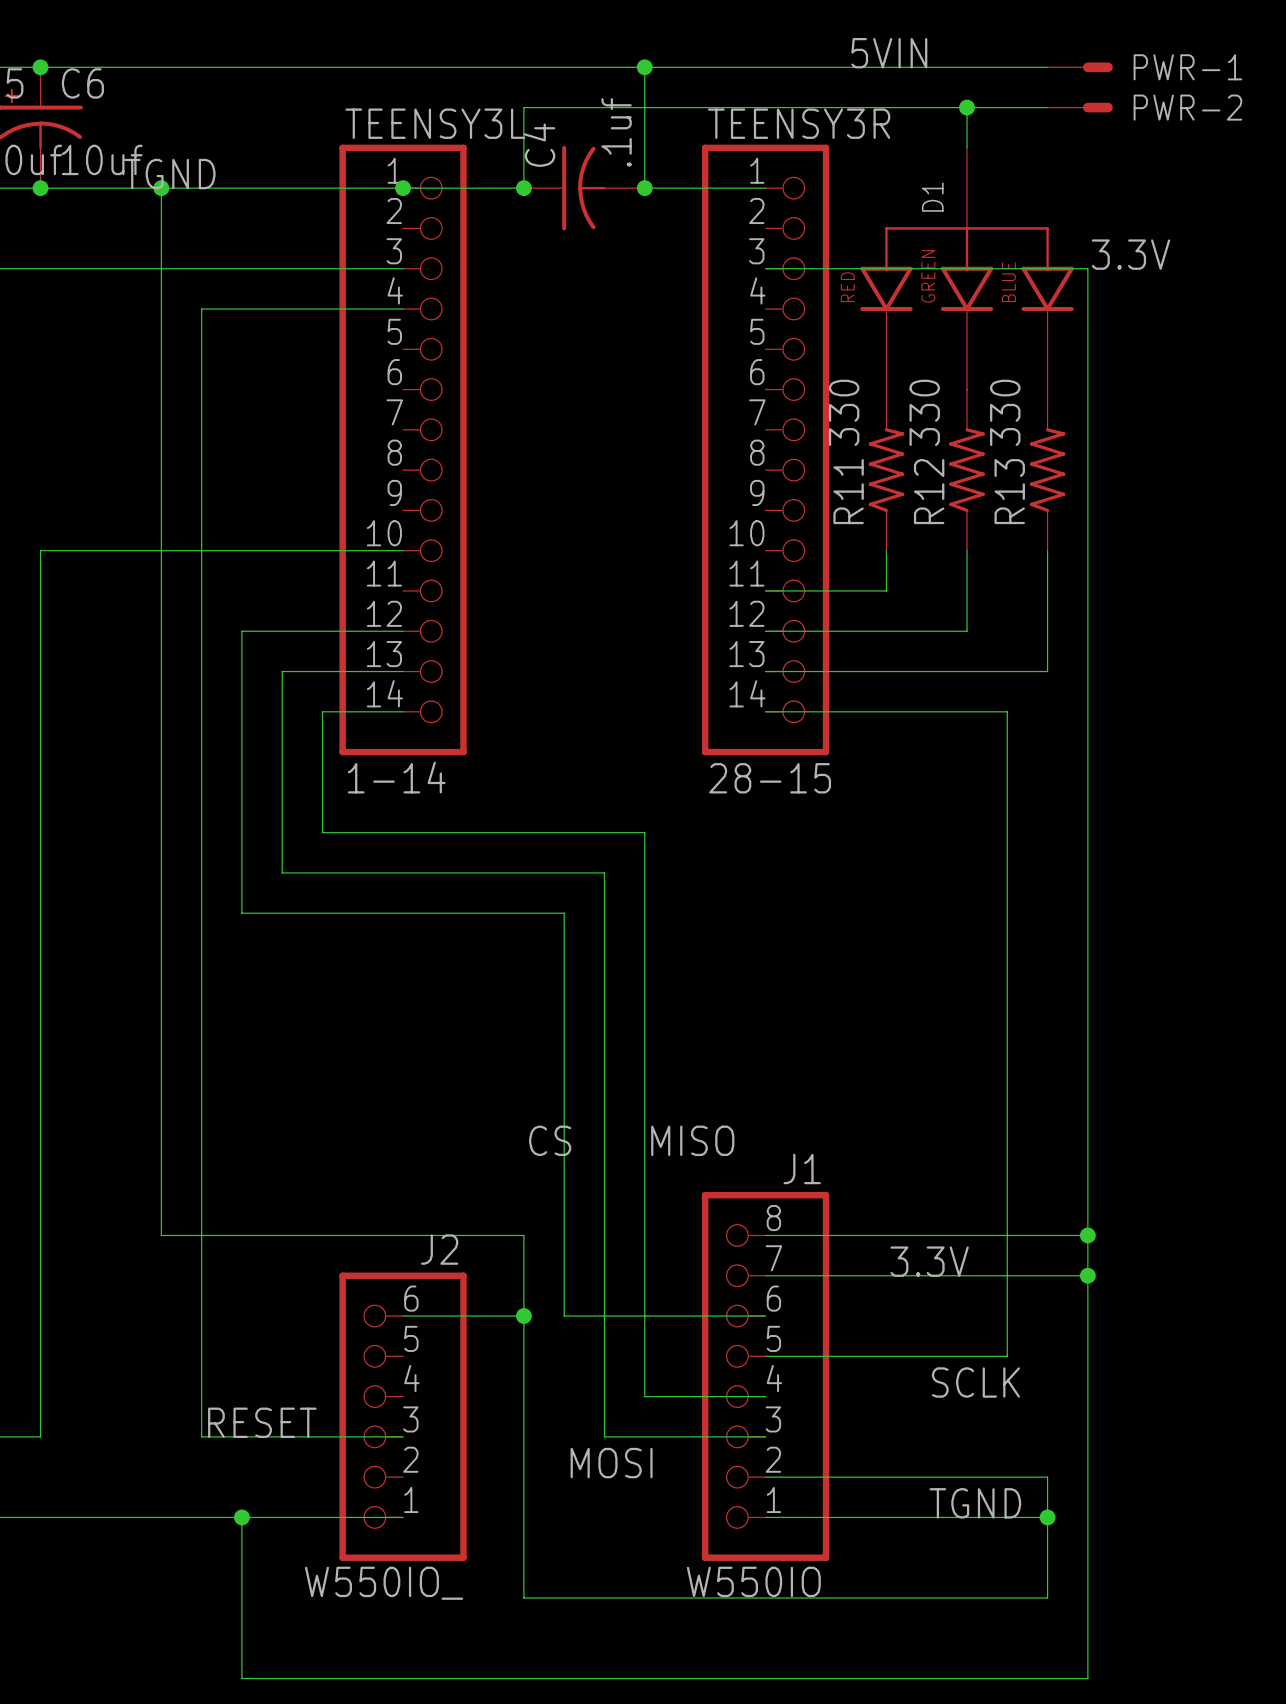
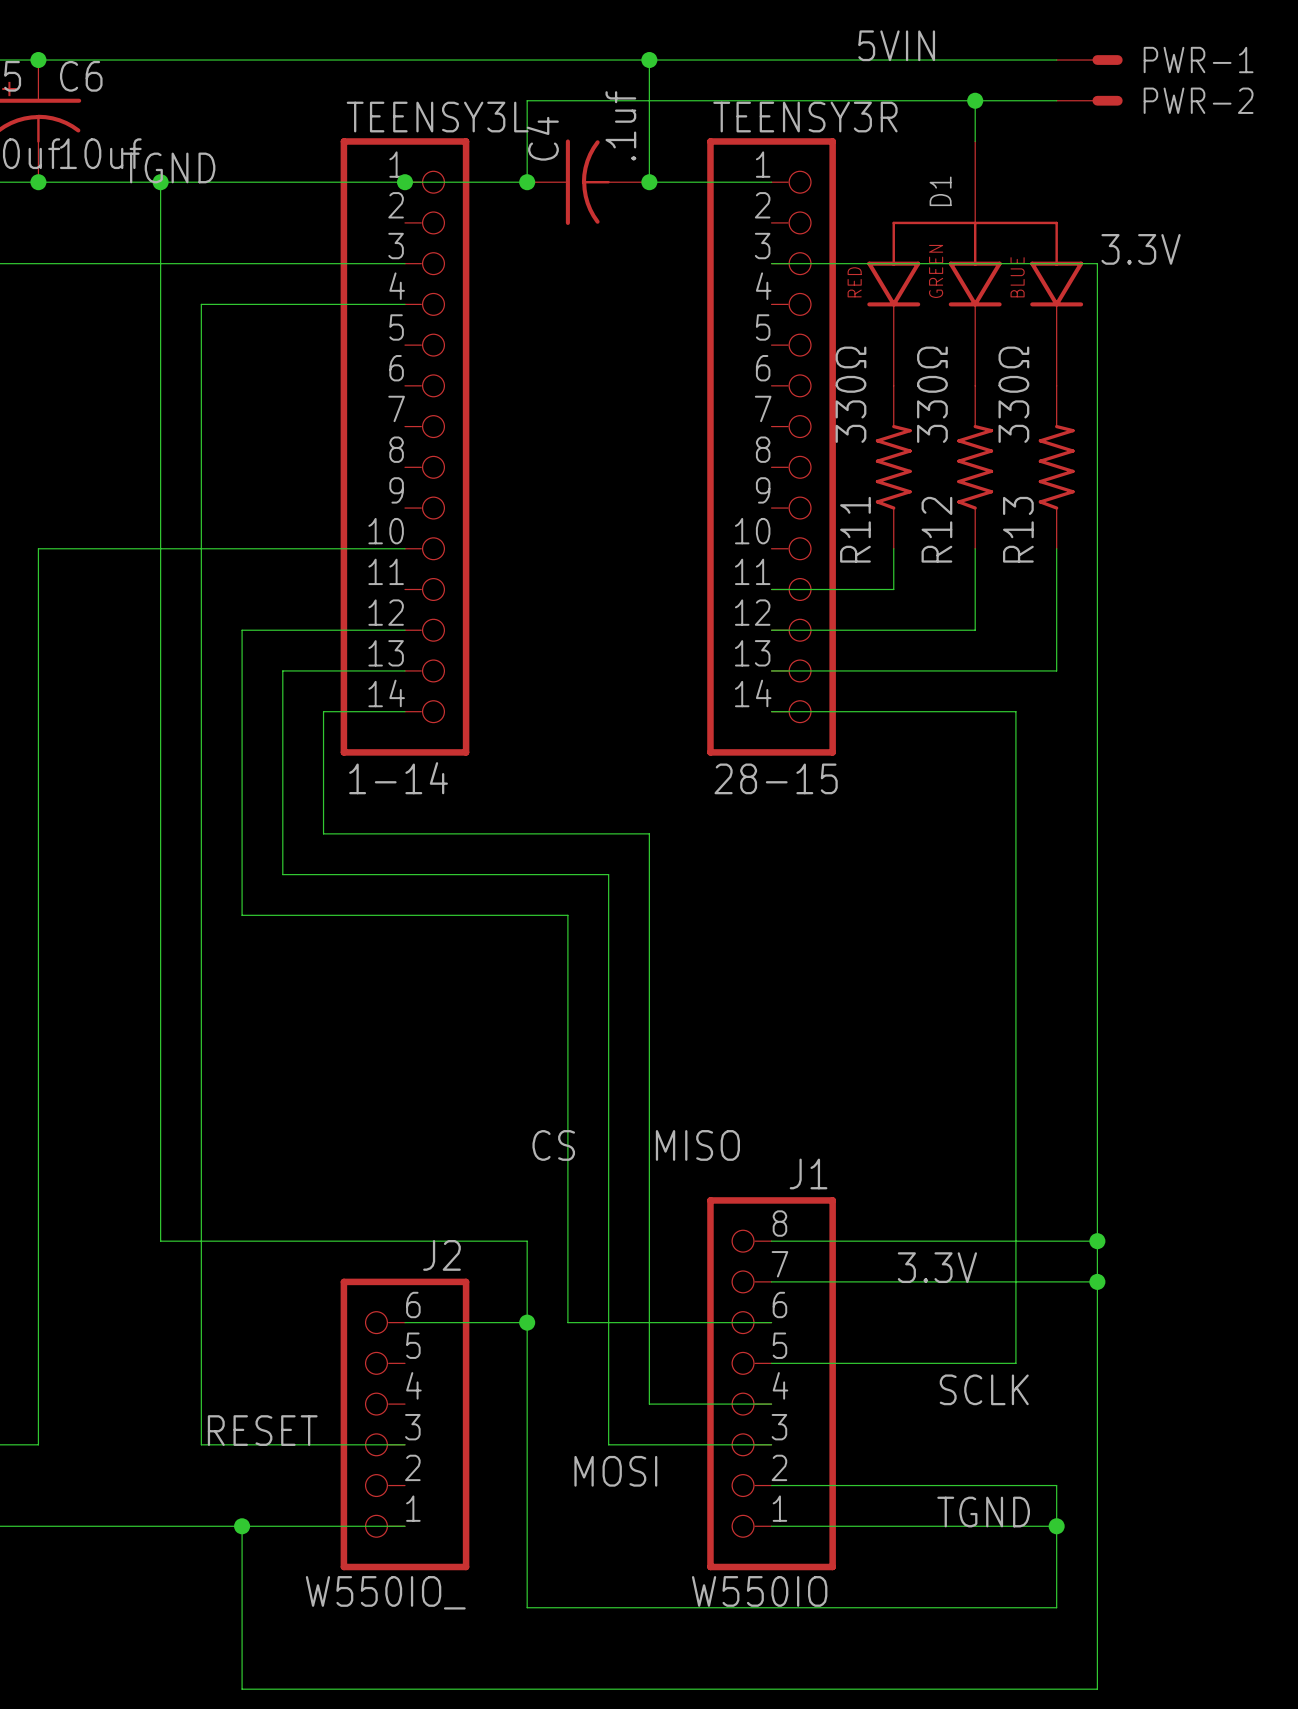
R11 value: 330 (844, 412) -> 330Ω (850, 394)
R12 value: 330 (924, 412) -> 330Ω (932, 394)
R13 value: 330 (1005, 412) -> 330Ω (1013, 394)
R11 name position: R11 (848, 491) -> R11 (855, 529)
R12 name position: R12 (929, 491) -> R12 (936, 529)
R13 name position: R13 (1009, 491) -> R13 (1018, 529)

